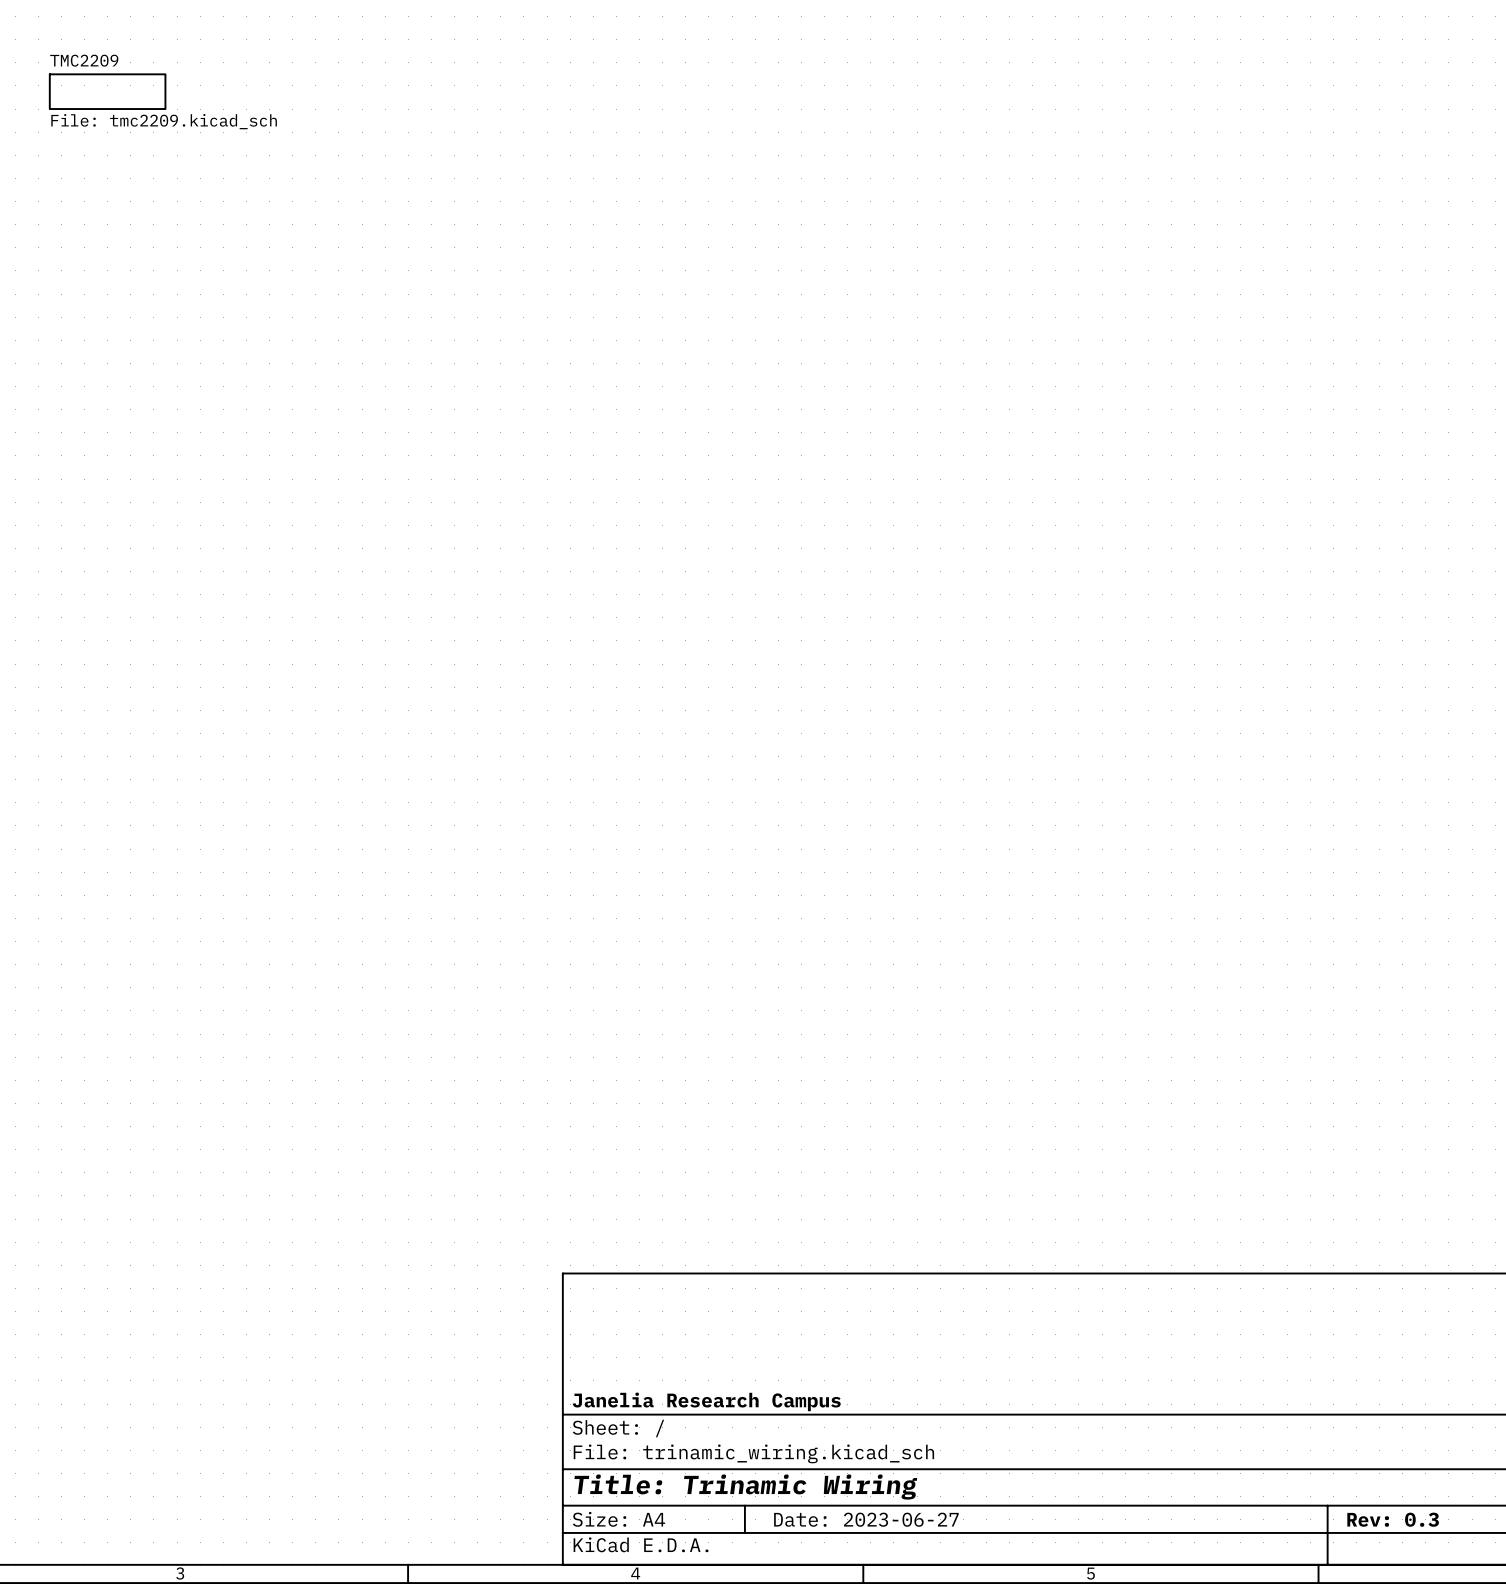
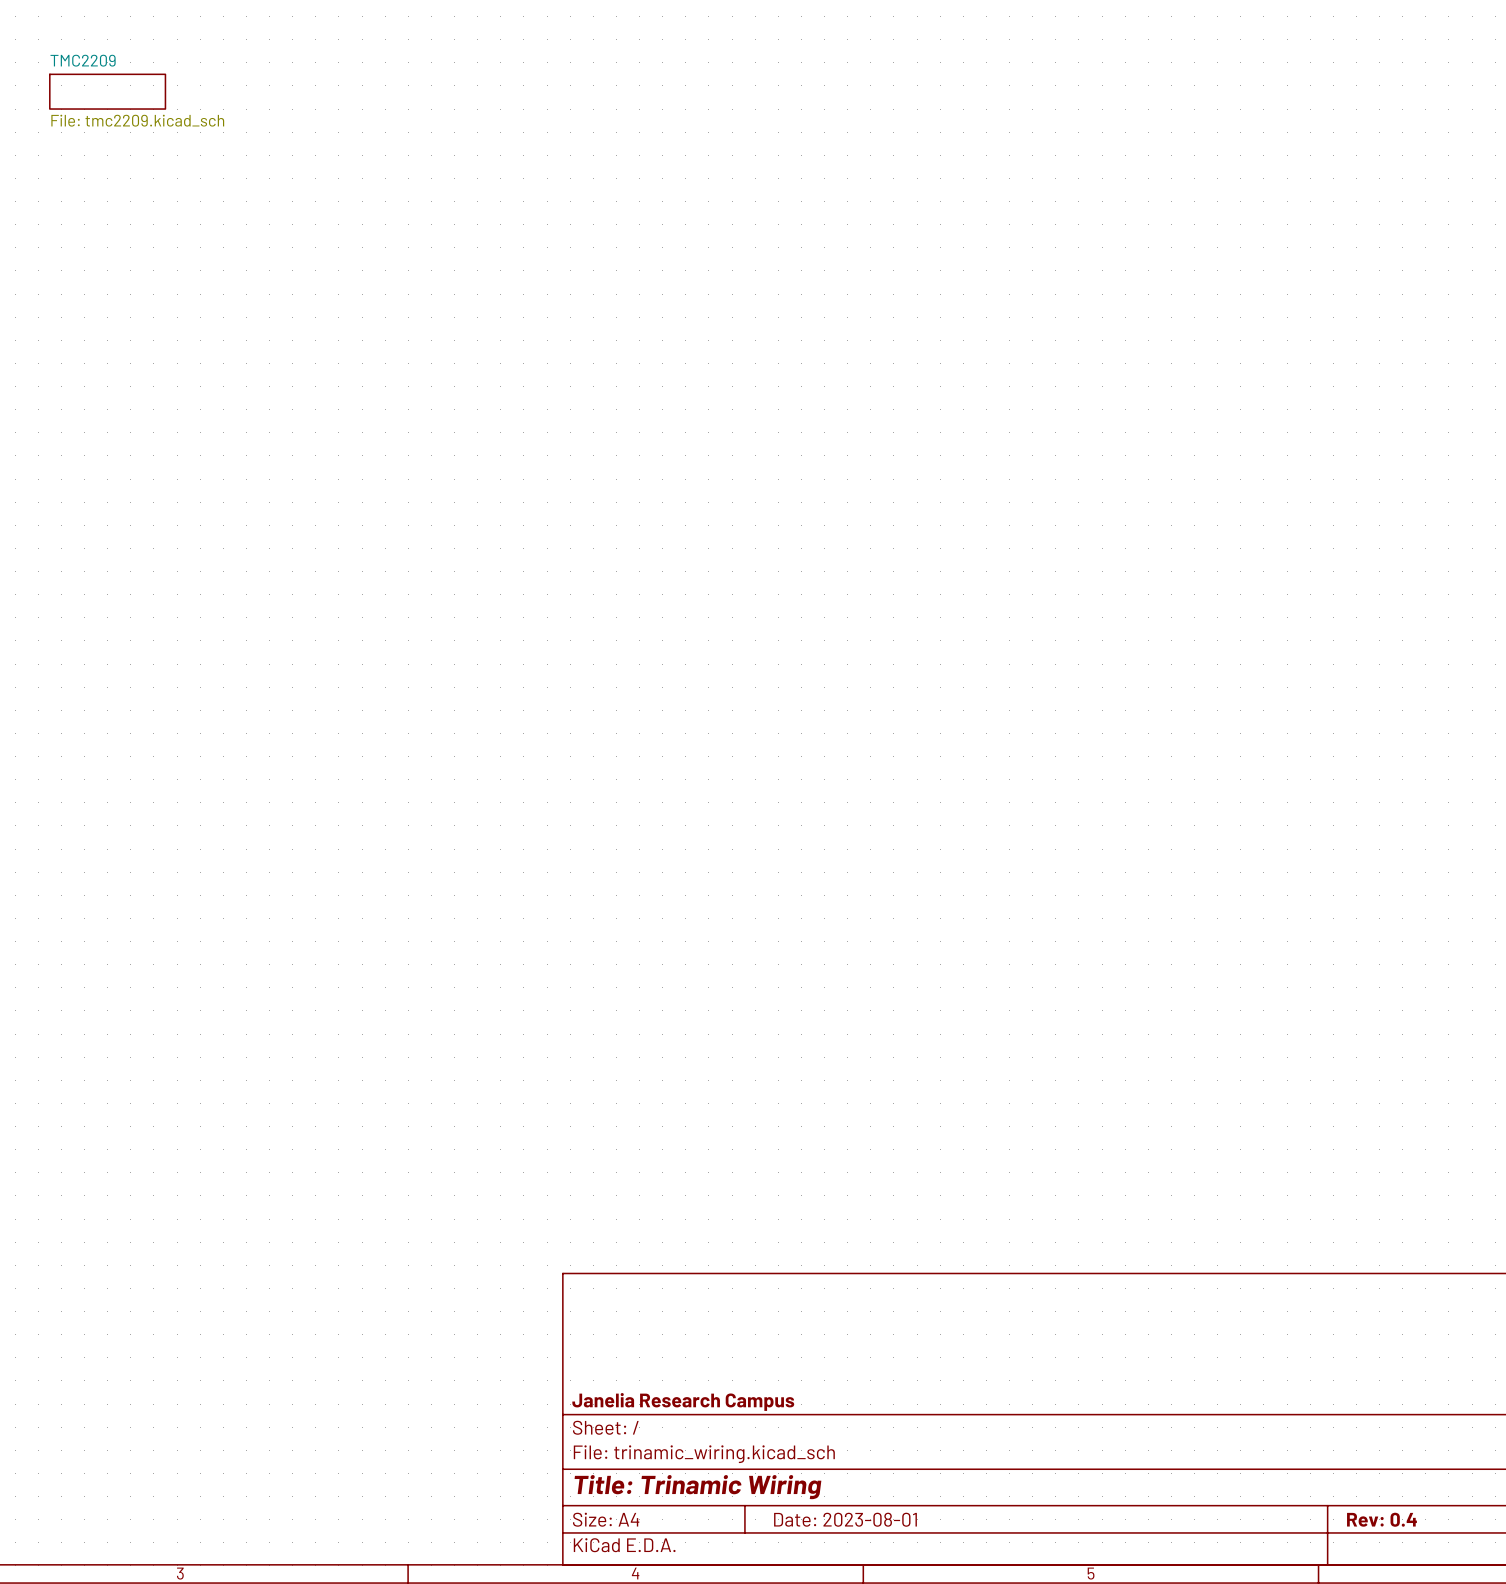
title block: Date: 2023-06-27 (866, 1519) -> Date: 2023-08-01 (845, 1519)
title block: Rev: 0.3 (1393, 1519) -> Rev: 0.4 (1381, 1519)

